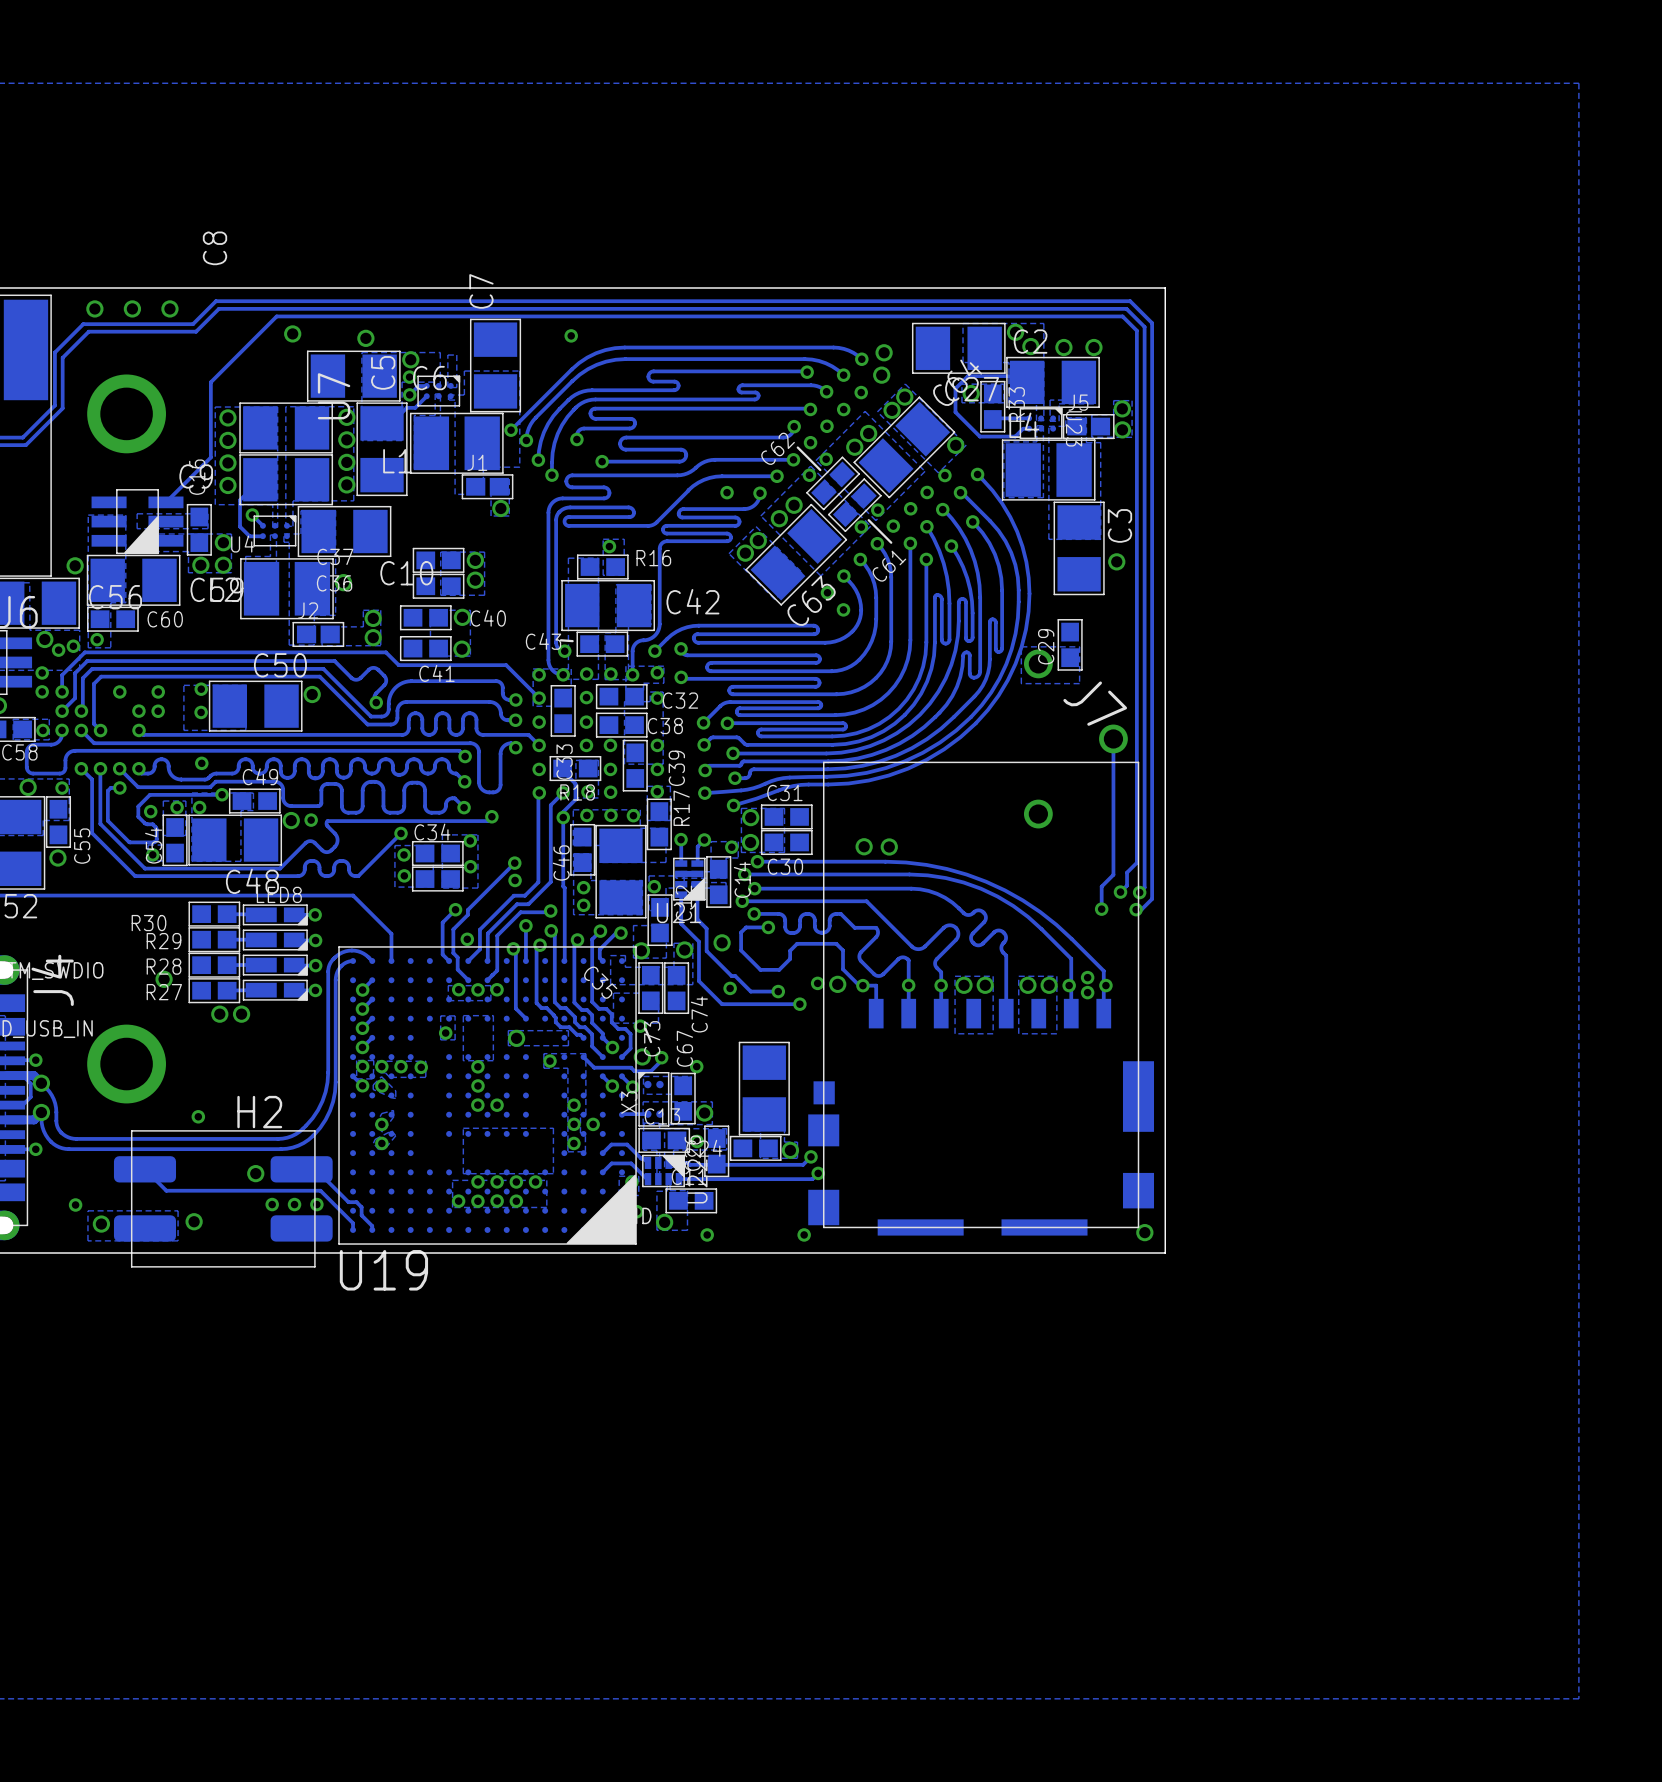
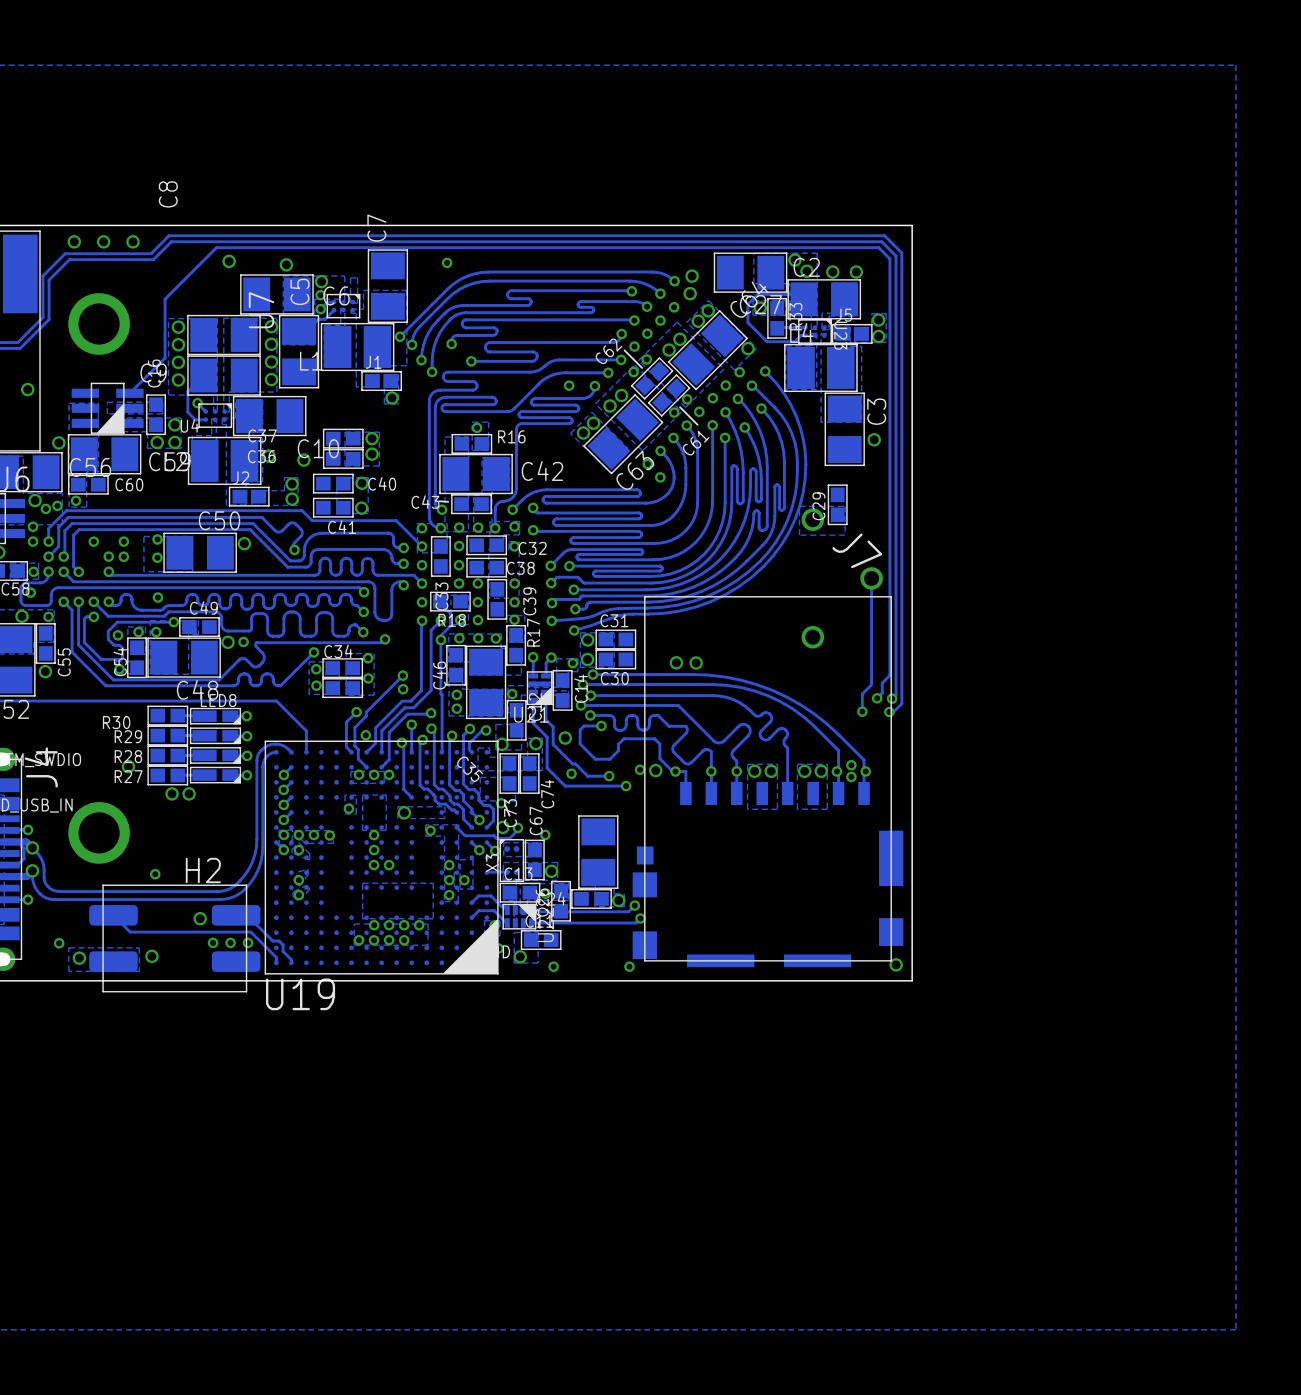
via: none -> (27, 389)
via: none -> (303, 460)
via: none -> (30, 592)
zone outline: none -> (472, 859) (472, 889) (460, 889) (460, 859) (472, 859)

